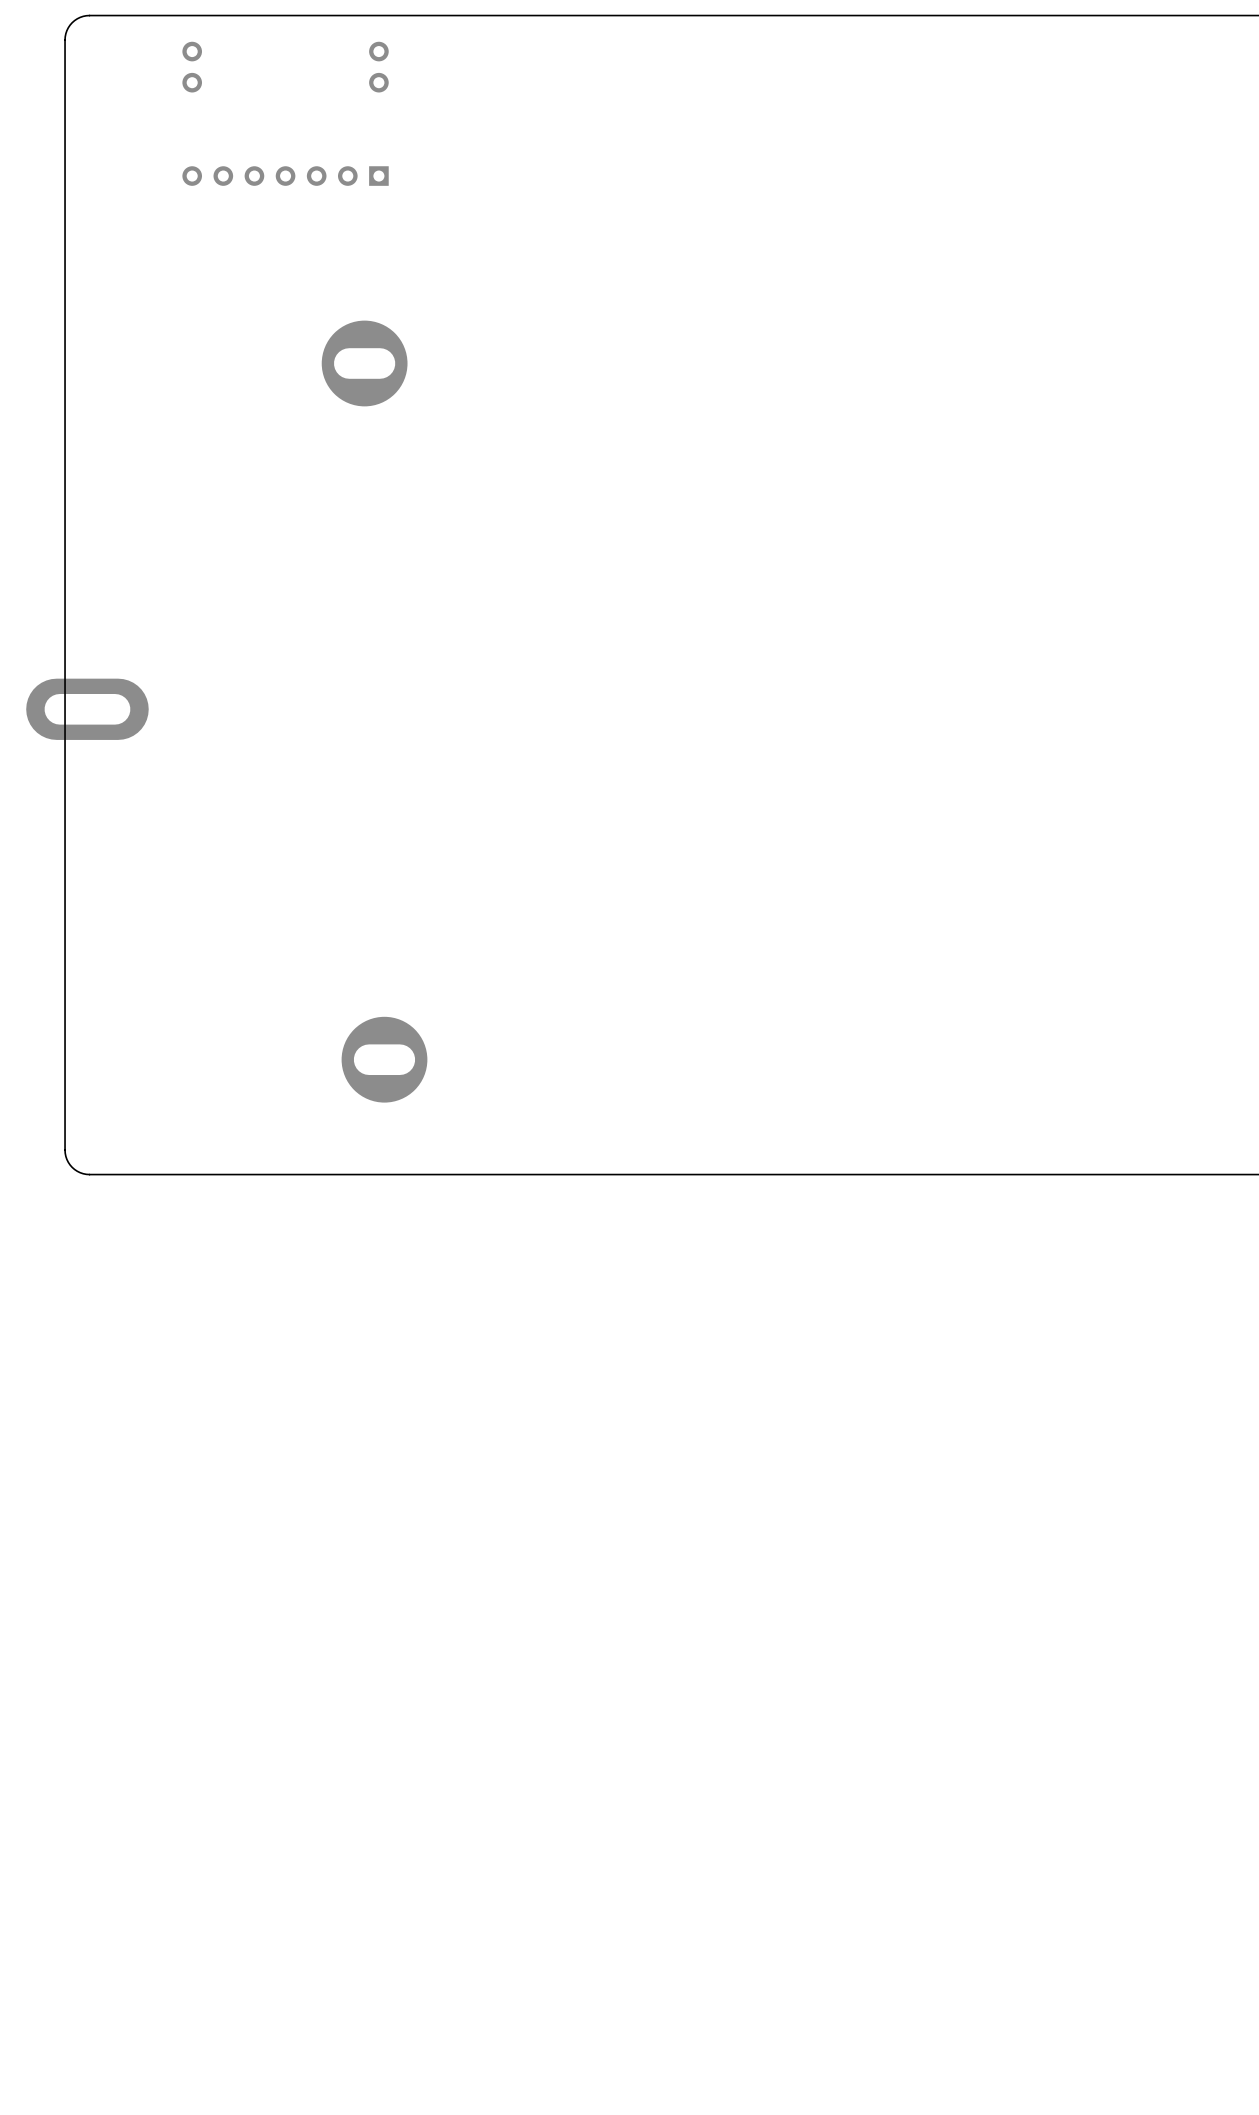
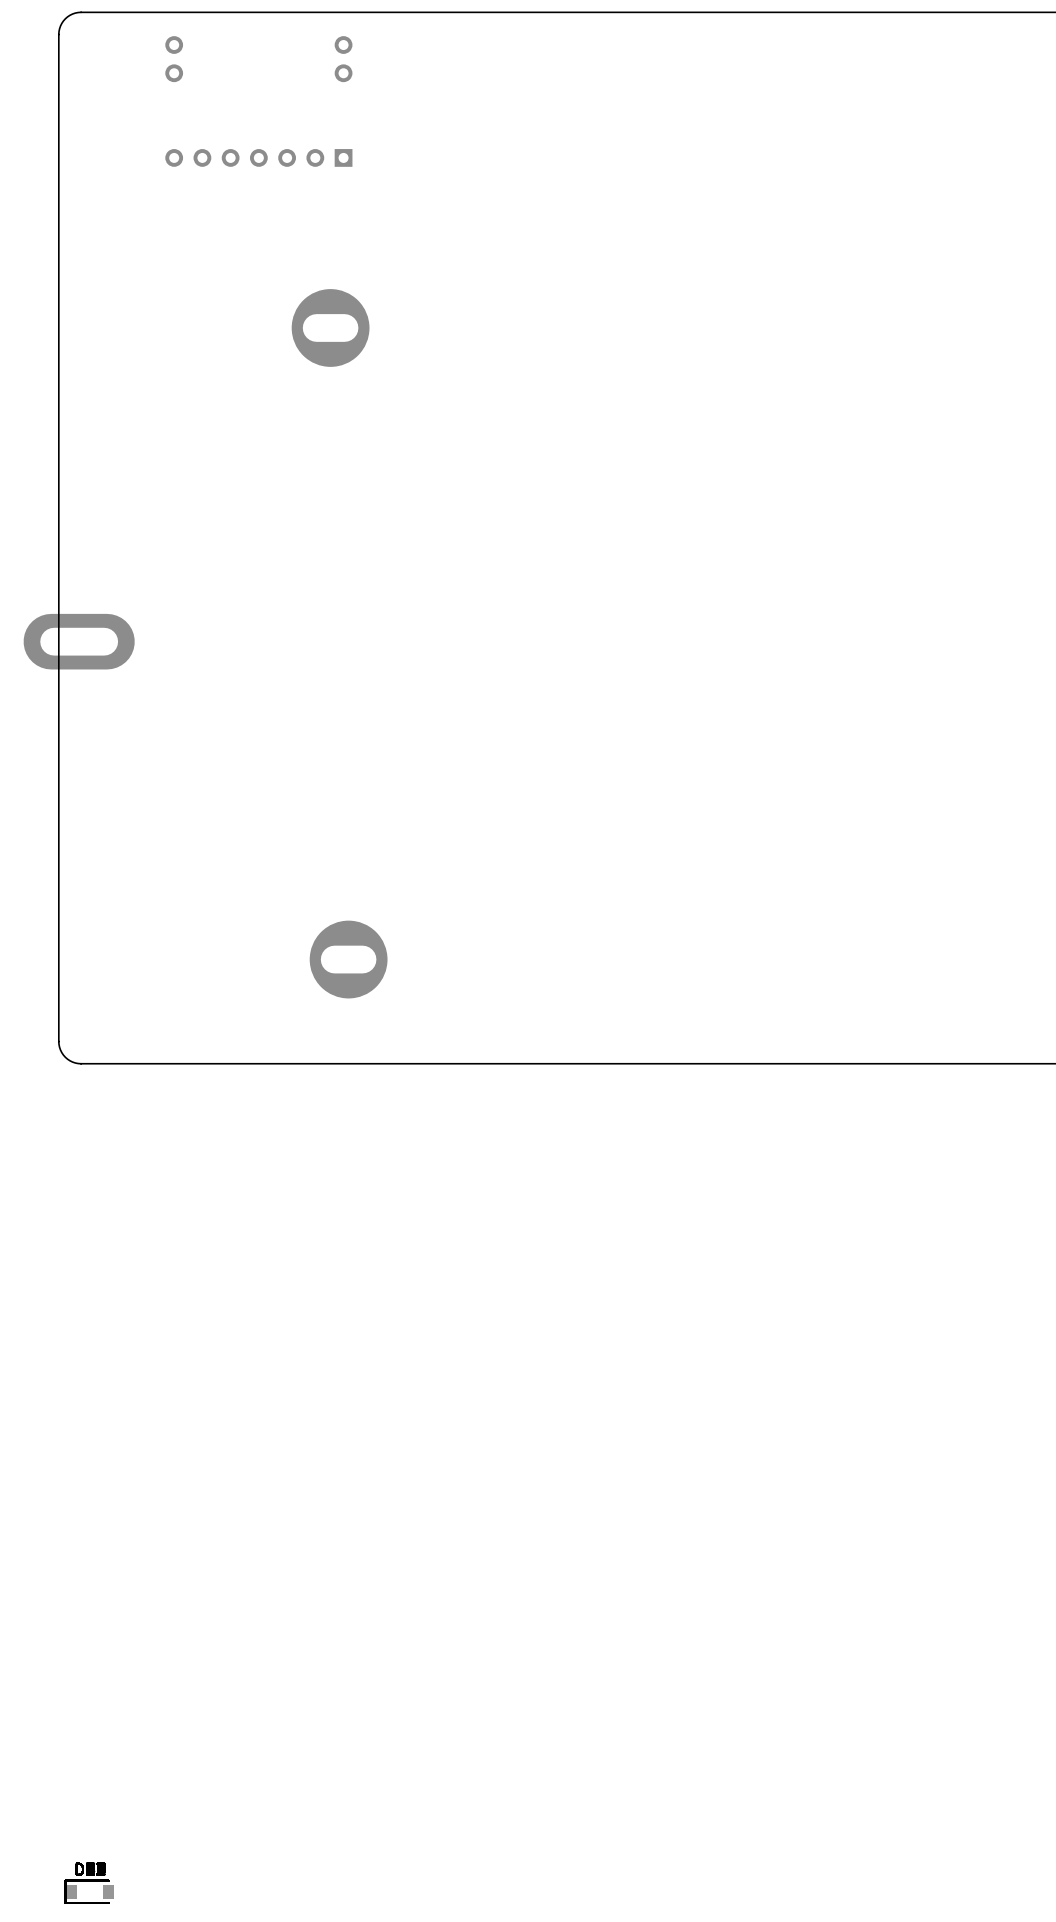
part: none -> (89, 1891)
part: none -> (89, 1891)
part: none -> (89, 1891)
part: none -> (89, 1891)
part: none -> (89, 1891)
part: none -> (89, 1891)
part: none -> (89, 1891)
part: none -> (89, 1891)
part: none -> (89, 1891)
part: none -> (89, 1891)
part: none -> (89, 1891)
part: none -> (89, 1891)
part: none -> (89, 1891)
part: none -> (89, 1891)
part: none -> (89, 1891)
part: none -> (89, 1891)
part: none -> (89, 1891)
part: none -> (89, 1891)
part: none -> (89, 1891)
part: none -> (89, 1891)
part: none -> (89, 1891)
part: none -> (89, 1891)
part: none -> (89, 1891)
part: none -> (89, 1891)
part: none -> (89, 1891)
part: none -> (89, 1891)
part: none -> (89, 1891)
part: none -> (89, 1891)
part: none -> (89, 1891)
part: none -> (89, 1891)
part: none -> (89, 1891)
part: none -> (89, 1891)
part: none -> (89, 1891)
part: none -> (89, 1891)
part: none -> (89, 1891)
part: none -> (89, 1891)
part: none -> (89, 1891)
part: none -> (89, 1891)
part: none -> (89, 1891)
part: none -> (89, 1891)
part: none -> (89, 1891)
part: none -> (89, 1891)
part: none -> (89, 1891)
part: none -> (89, 1891)
part: none -> (89, 1891)
part: none -> (89, 1891)
part: none -> (89, 1891)
part: none -> (89, 1891)
part: none -> (89, 1891)
part: none -> (89, 1891)
part: none -> (89, 1891)
part: none -> (89, 1891)
part: none -> (89, 1891)
part: none -> (89, 1891)
part: none -> (89, 1891)
part: none -> (89, 1891)
part: none -> (89, 1891)
part: none -> (89, 1891)
part: none -> (89, 1891)
part: none -> (89, 1891)
part: none -> (89, 1891)
part: none -> (89, 1891)
part: none -> (89, 1891)
part: none -> (89, 1891)
part: none -> (89, 1891)
part: none -> (89, 1891)
part: none -> (89, 1891)
part: none -> (89, 1891)
part: none -> (89, 1891)
part: none -> (89, 1891)
part: none -> (89, 1891)
part: none -> (89, 1891)
part: none -> (89, 1891)
part: none -> (89, 1891)
part: none -> (89, 1891)
part: none -> (89, 1891)
part: none -> (89, 1891)
part: none -> (89, 1891)
part: none -> (89, 1891)
part: none -> (89, 1891)
part: none -> (89, 1891)
part: none -> (89, 1891)
part: none -> (89, 1891)
part: none -> (89, 1891)
part: none -> (89, 1891)
part: none -> (89, 1891)
part: none -> (89, 1891)
part: none -> (89, 1891)
part: none -> (89, 1891)
part: none -> (89, 1891)
part: none -> (89, 1891)
part: none -> (89, 1891)
part: none -> (89, 1891)
part: none -> (89, 1891)
part: none -> (89, 1891)
part: none -> (89, 1891)
part: none -> (89, 1891)
part: none -> (89, 1891)
part: none -> (89, 1891)
part: none -> (89, 1891)

